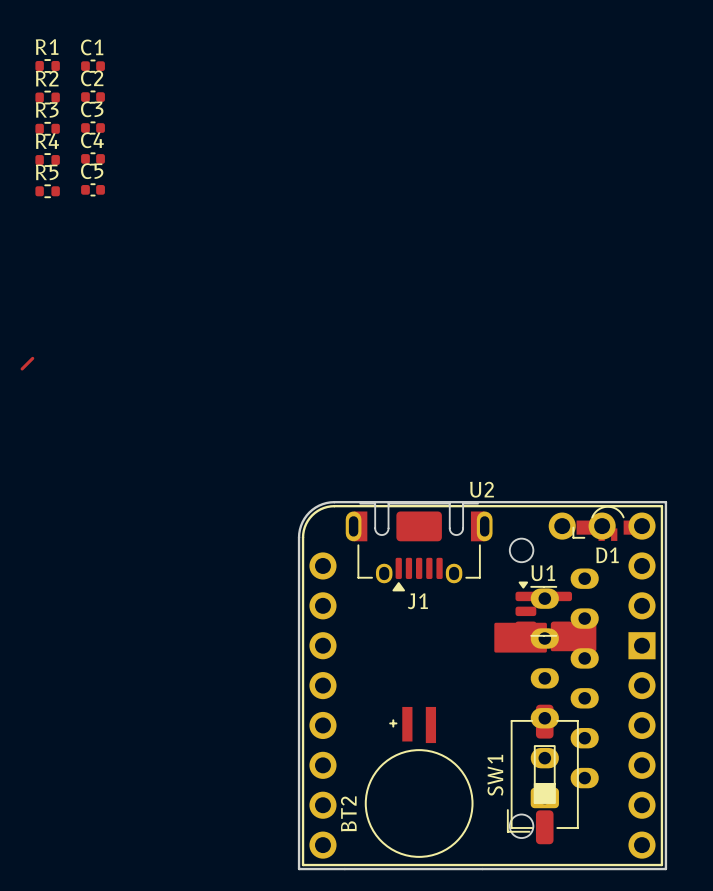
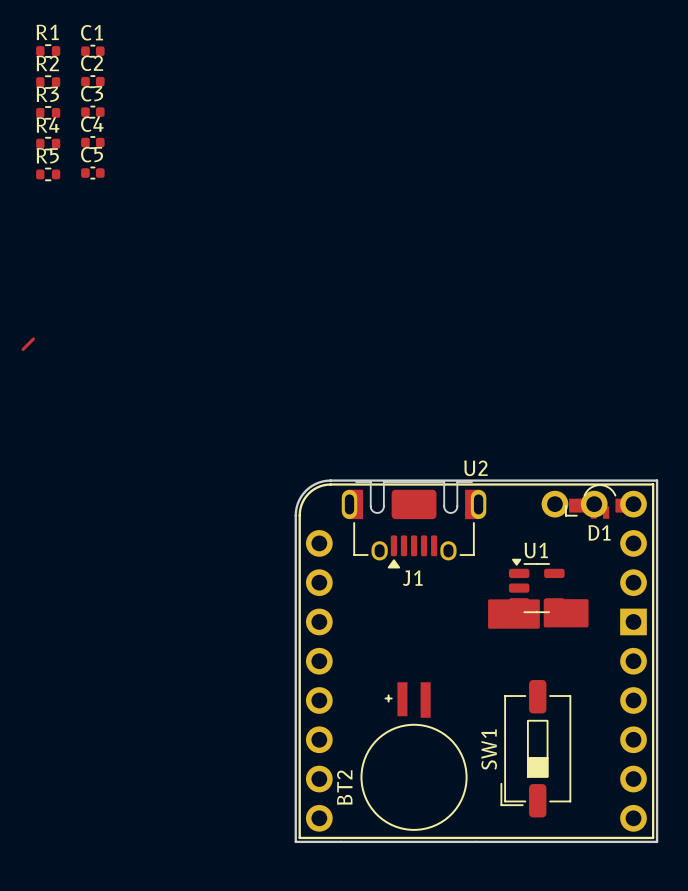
part: (554, 688) -> none

